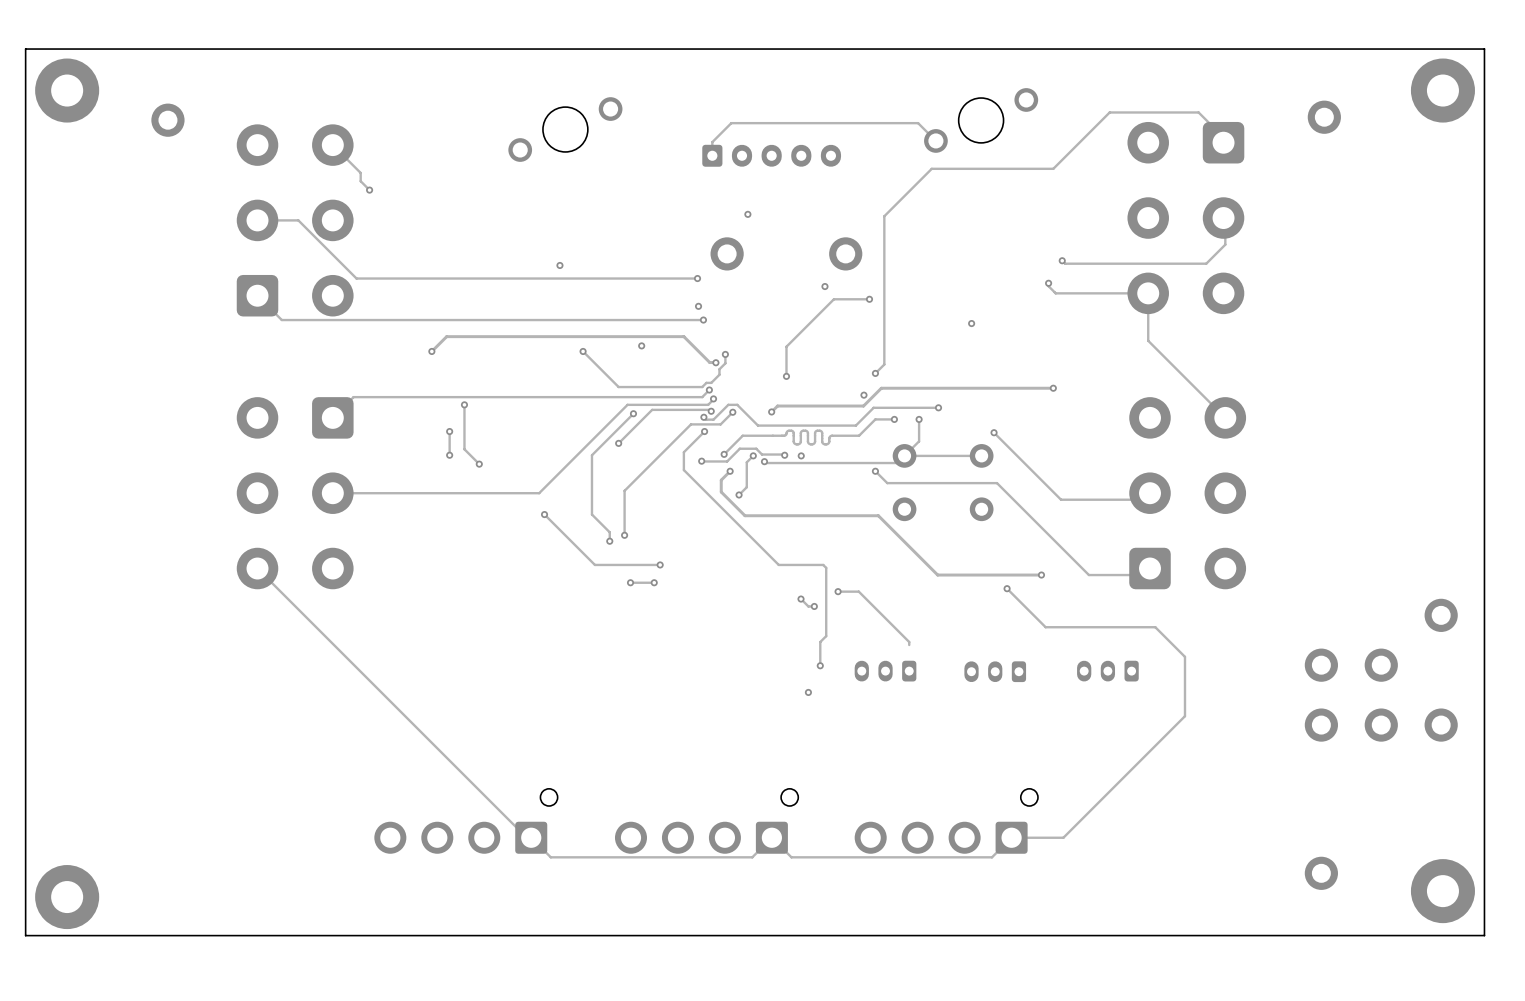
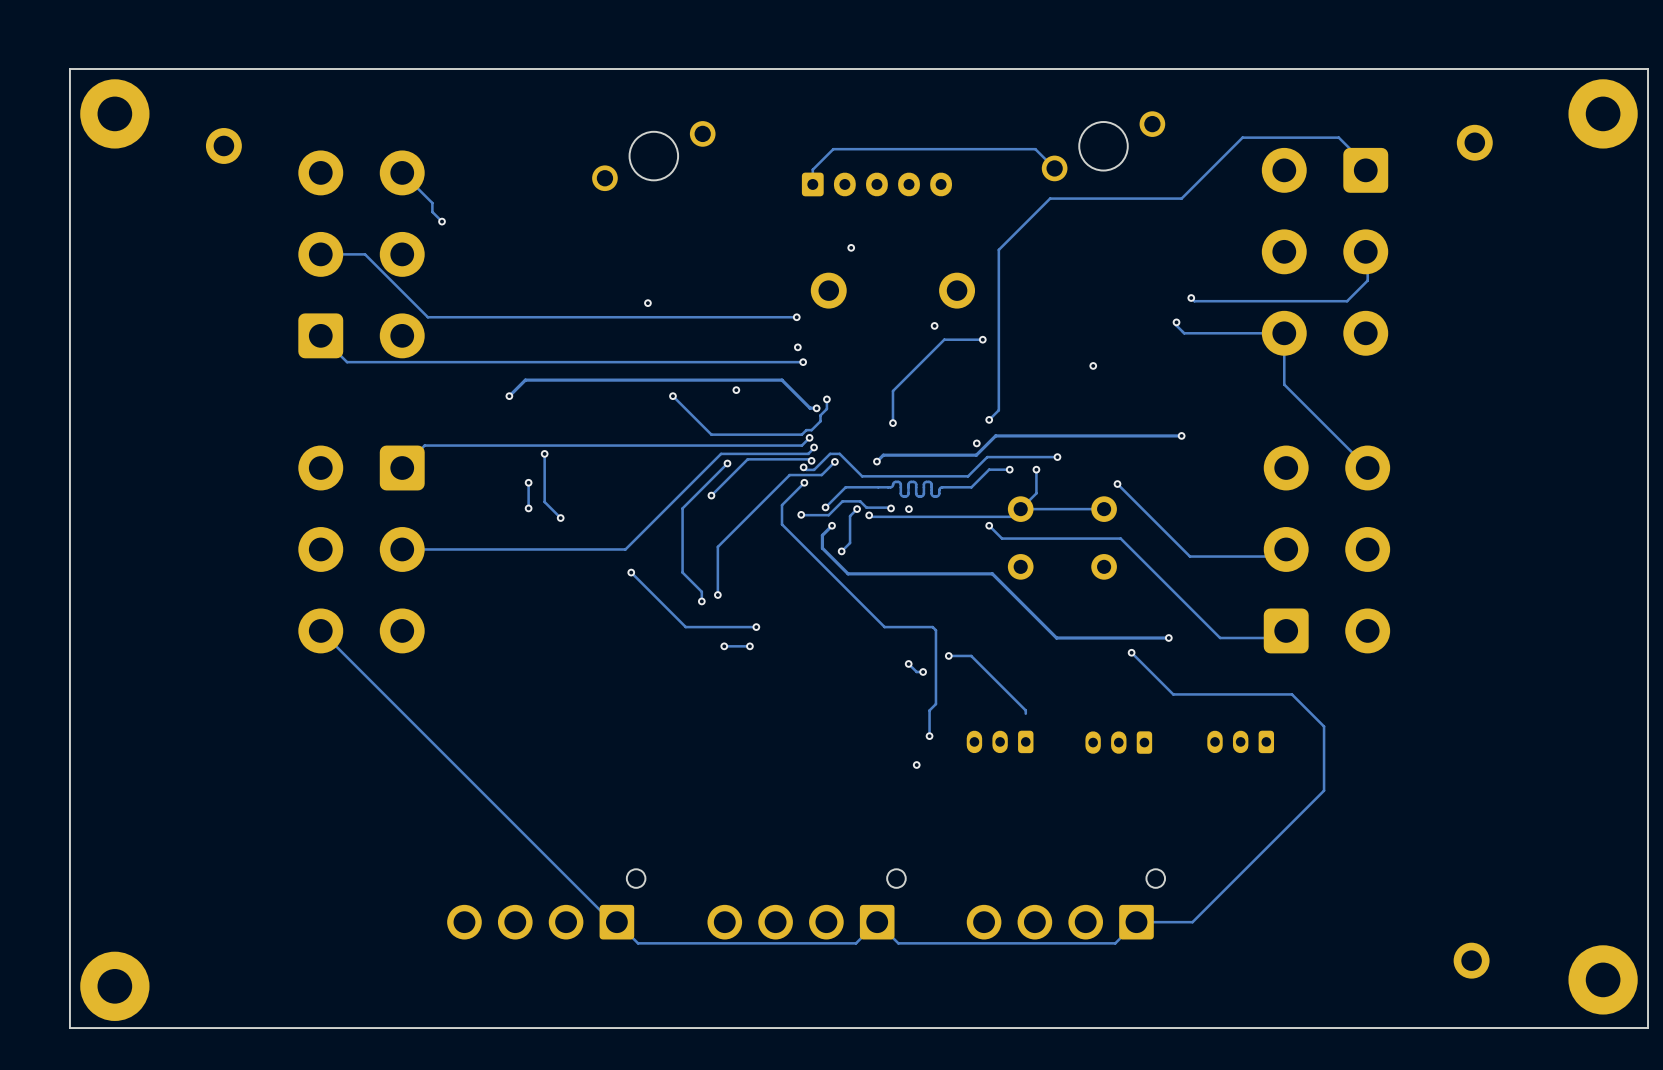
part: (1441, 615) -> none
part: (1321, 665) -> none
part: (1381, 665) -> none
part: (1321, 725) -> none
part: (1381, 725) -> none
part: (1441, 725) -> none

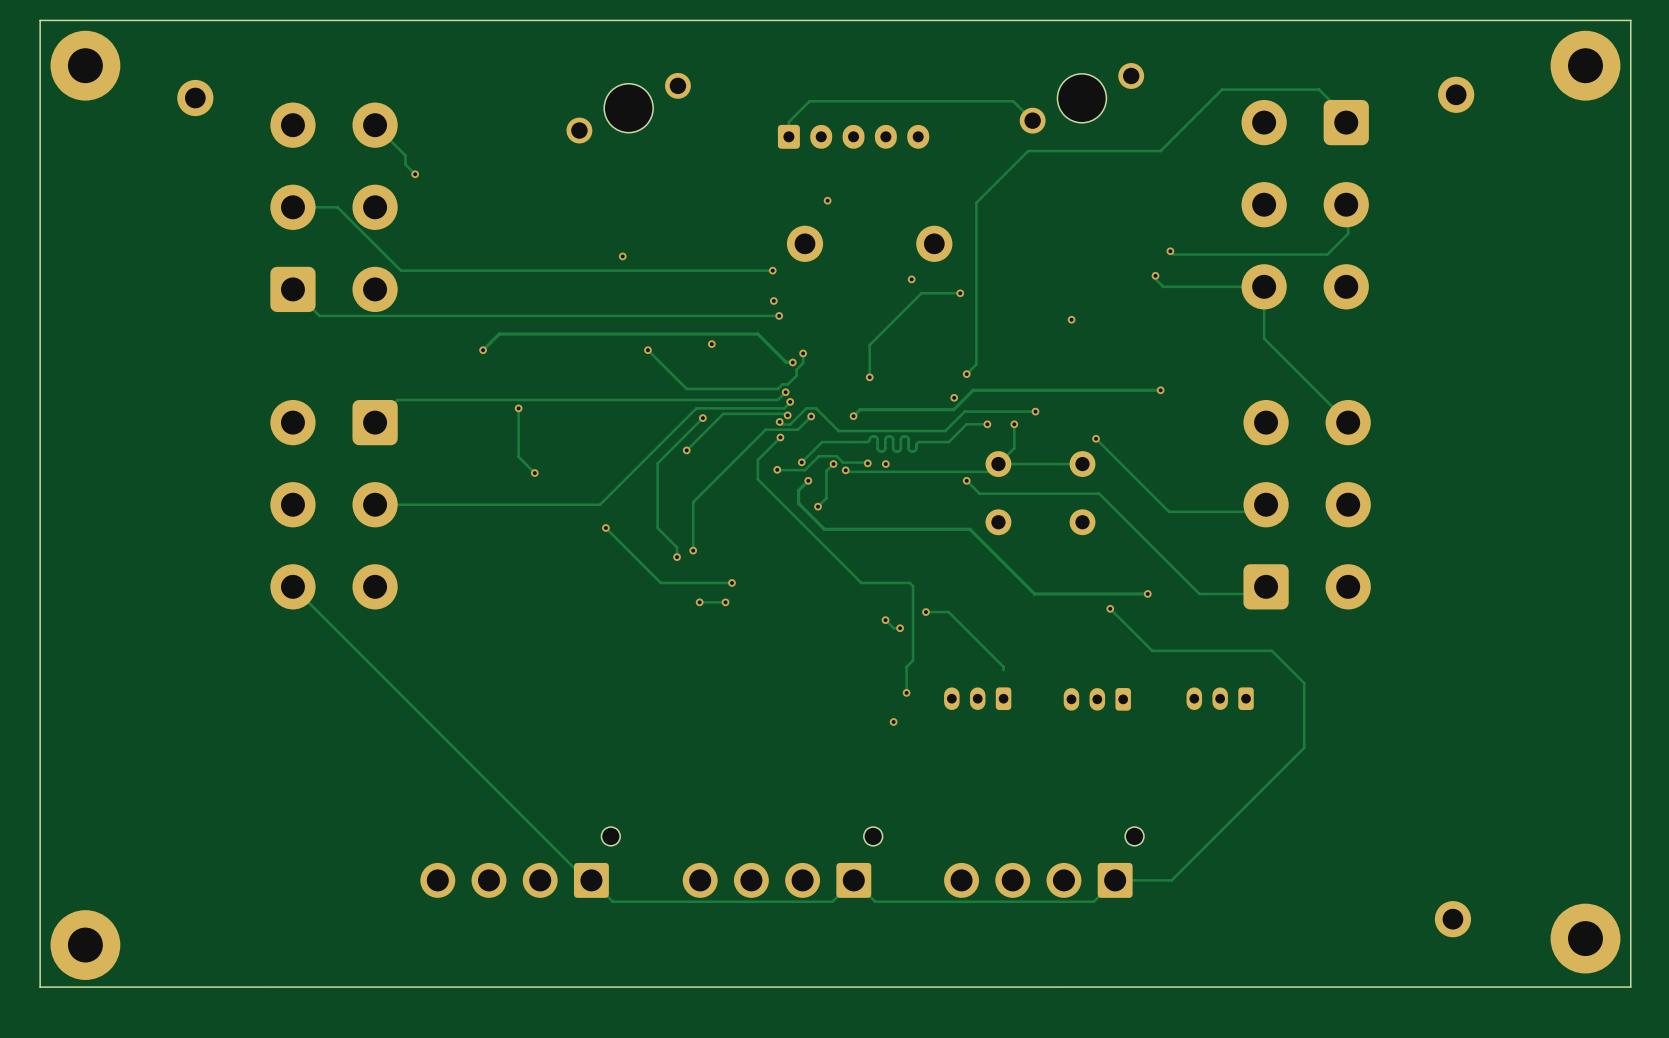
track: (528, 482) (528, 508) -> none
via: (528, 482) -> none
via: (528, 508) -> none

